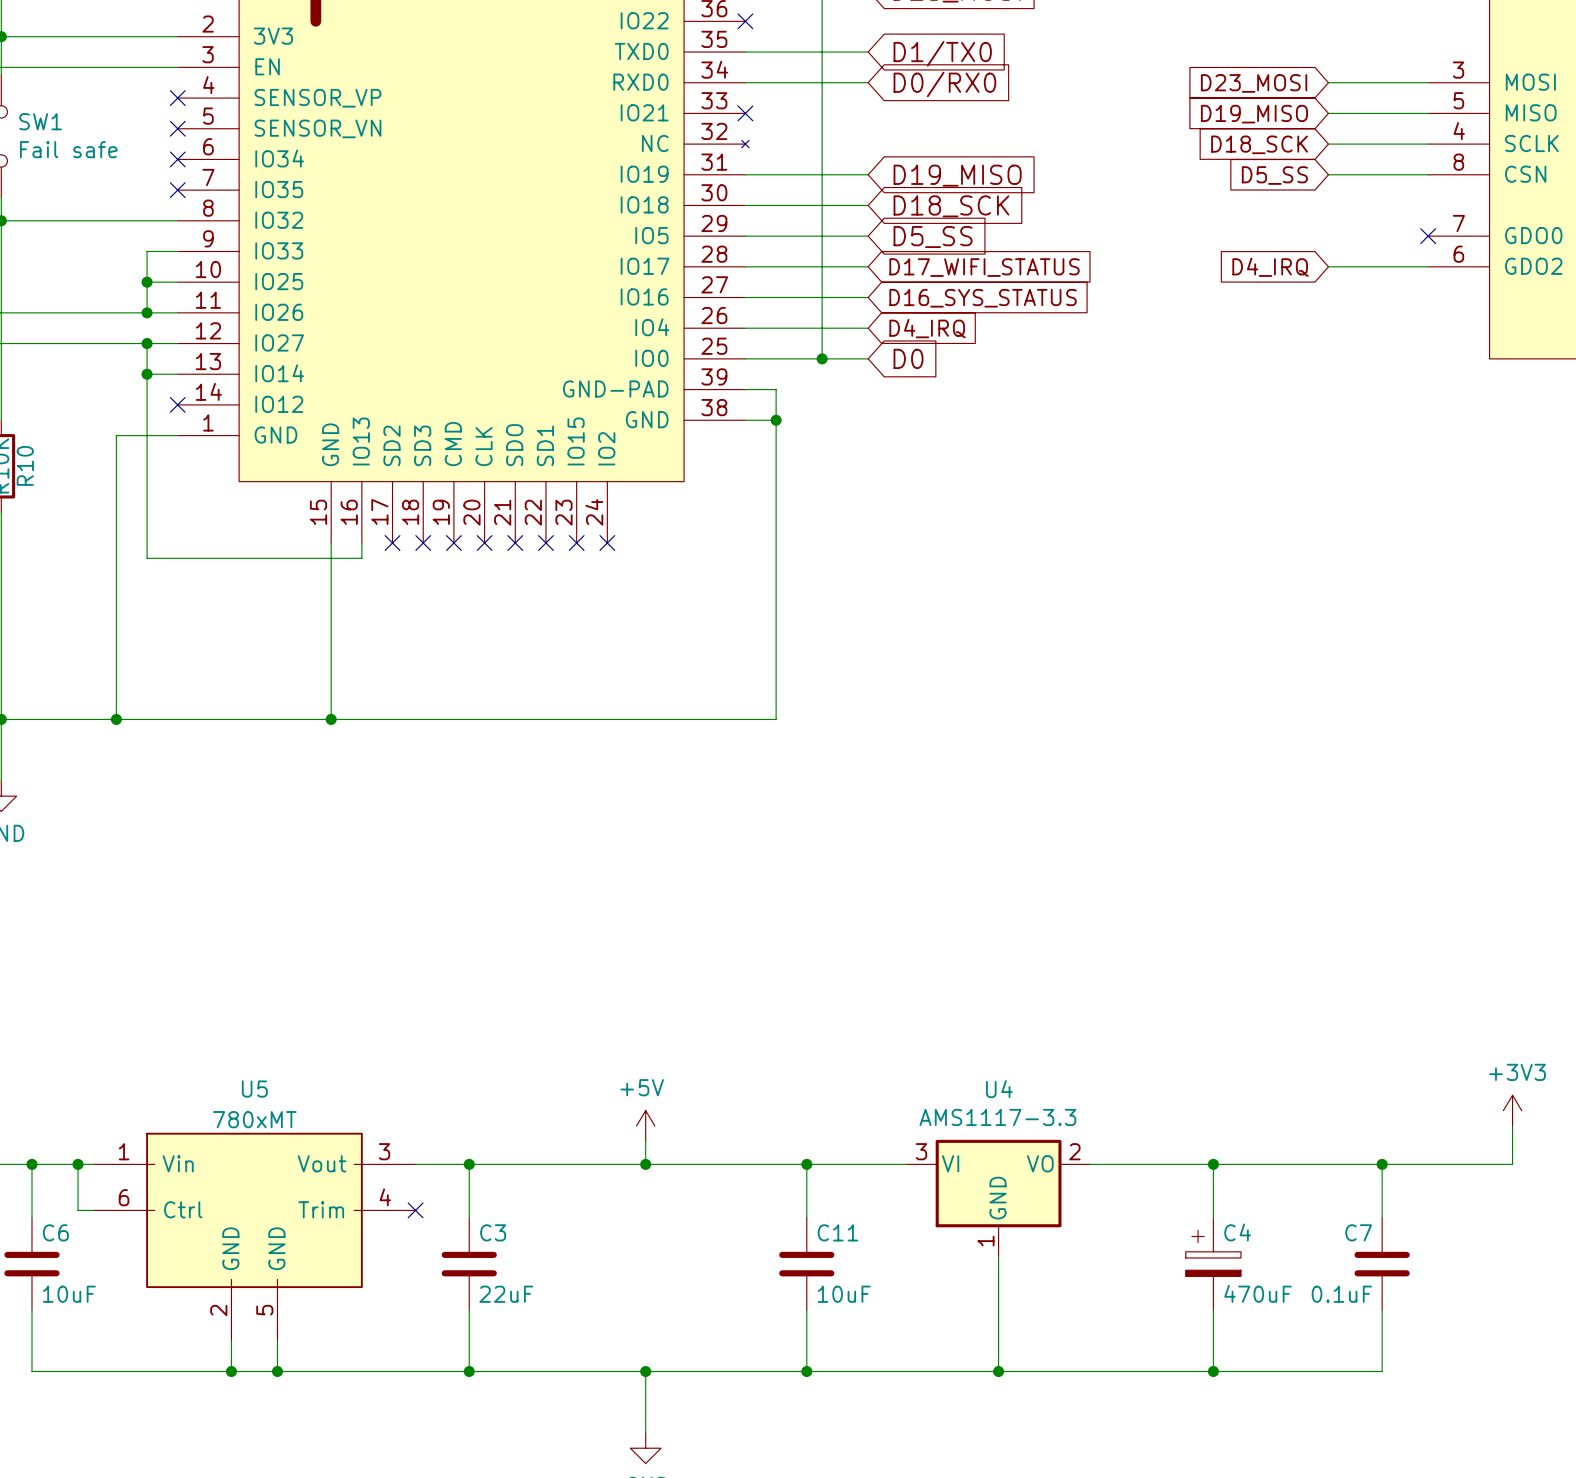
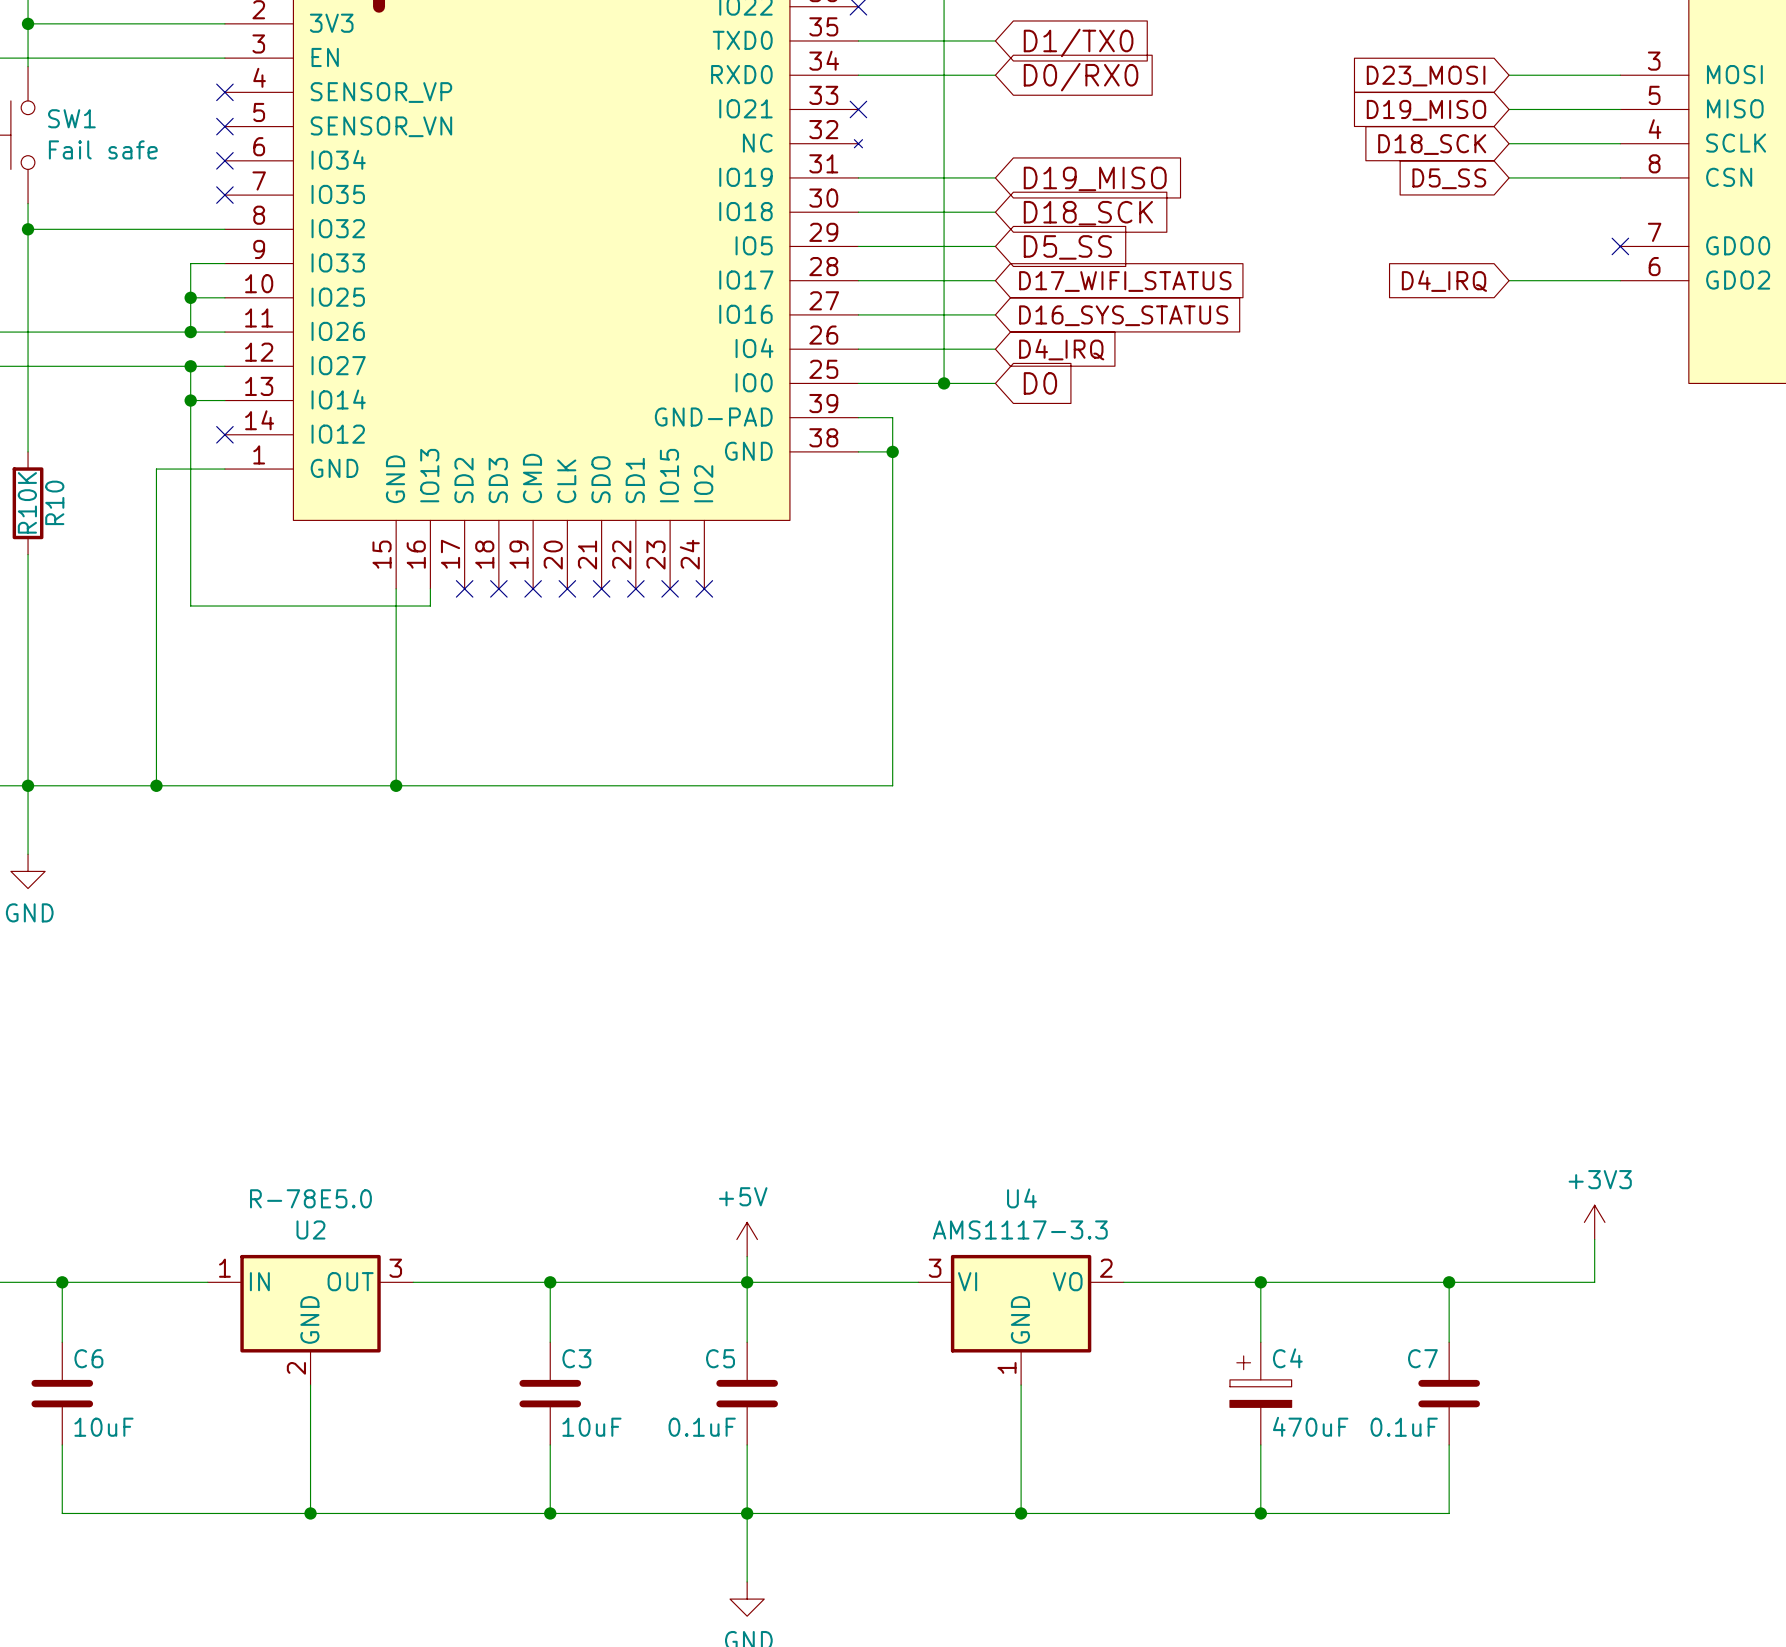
power symbol position: +3V3 (1512, 1110) -> +3V3 (1594, 1222)
wire: (1512, 1126) (1512, 1164) (1405, 1164) -> (1594, 1239) (1594, 1282)
wire: (78, 1164) (78, 1210) (93, 1210) -> none
junction: (78, 1164) -> none
wire: (806, 1164) (806, 1218) -> (747, 1282) (747, 1342)
junction: (806, 1164) -> none
junction: none -> (1260, 1282)
wire: (1213, 1164) (1213, 1218) -> (1260, 1282) (1260, 1342)
junction: (1213, 1164) -> none
junction: none -> (1449, 1282)
wire: (1382, 1164) (1382, 1218) -> (1449, 1282) (1449, 1342)
junction: (1382, 1164) -> none
R-78E5.0: none -> U2 (310, 1319)
U4 position: (998, 1198) -> (1021, 1319)
no-connect mark: (415, 1210) -> none
U5: 780xMT (254, 1236) -> none
wire: none -> (310, 1385) (310, 1513)
wire: (998, 1256) (998, 1371) -> (1021, 1385) (1021, 1513)
C5: none -> 0.1uF (747, 1393)
C11: 10uF (806, 1264) -> none
C4 position: (1213, 1264) -> (1260, 1393)
C7 position: (1382, 1264) -> (1449, 1393)
C3 value: 22uF (506, 1294) -> 10uF (591, 1427)
wire: (806, 1310) (806, 1371) -> (747, 1444) (747, 1513)
wire: (1213, 1310) (1213, 1371) -> (1260, 1444) (1260, 1513)
wire: (1382, 1310) (1382, 1371) (1274, 1371) -> (1449, 1444) (1449, 1513)
wire: (231, 1340) (231, 1371) -> none
wire: (277, 1340) (277, 1371) -> none
junction: (231, 1371) -> none
junction: none -> (310, 1513)
junction: (277, 1371) -> none
junction: (806, 1371) -> none
junction: none -> (1021, 1513)
junction: (998, 1371) -> none
junction: none -> (1260, 1513)
junction: (1213, 1371) -> none

